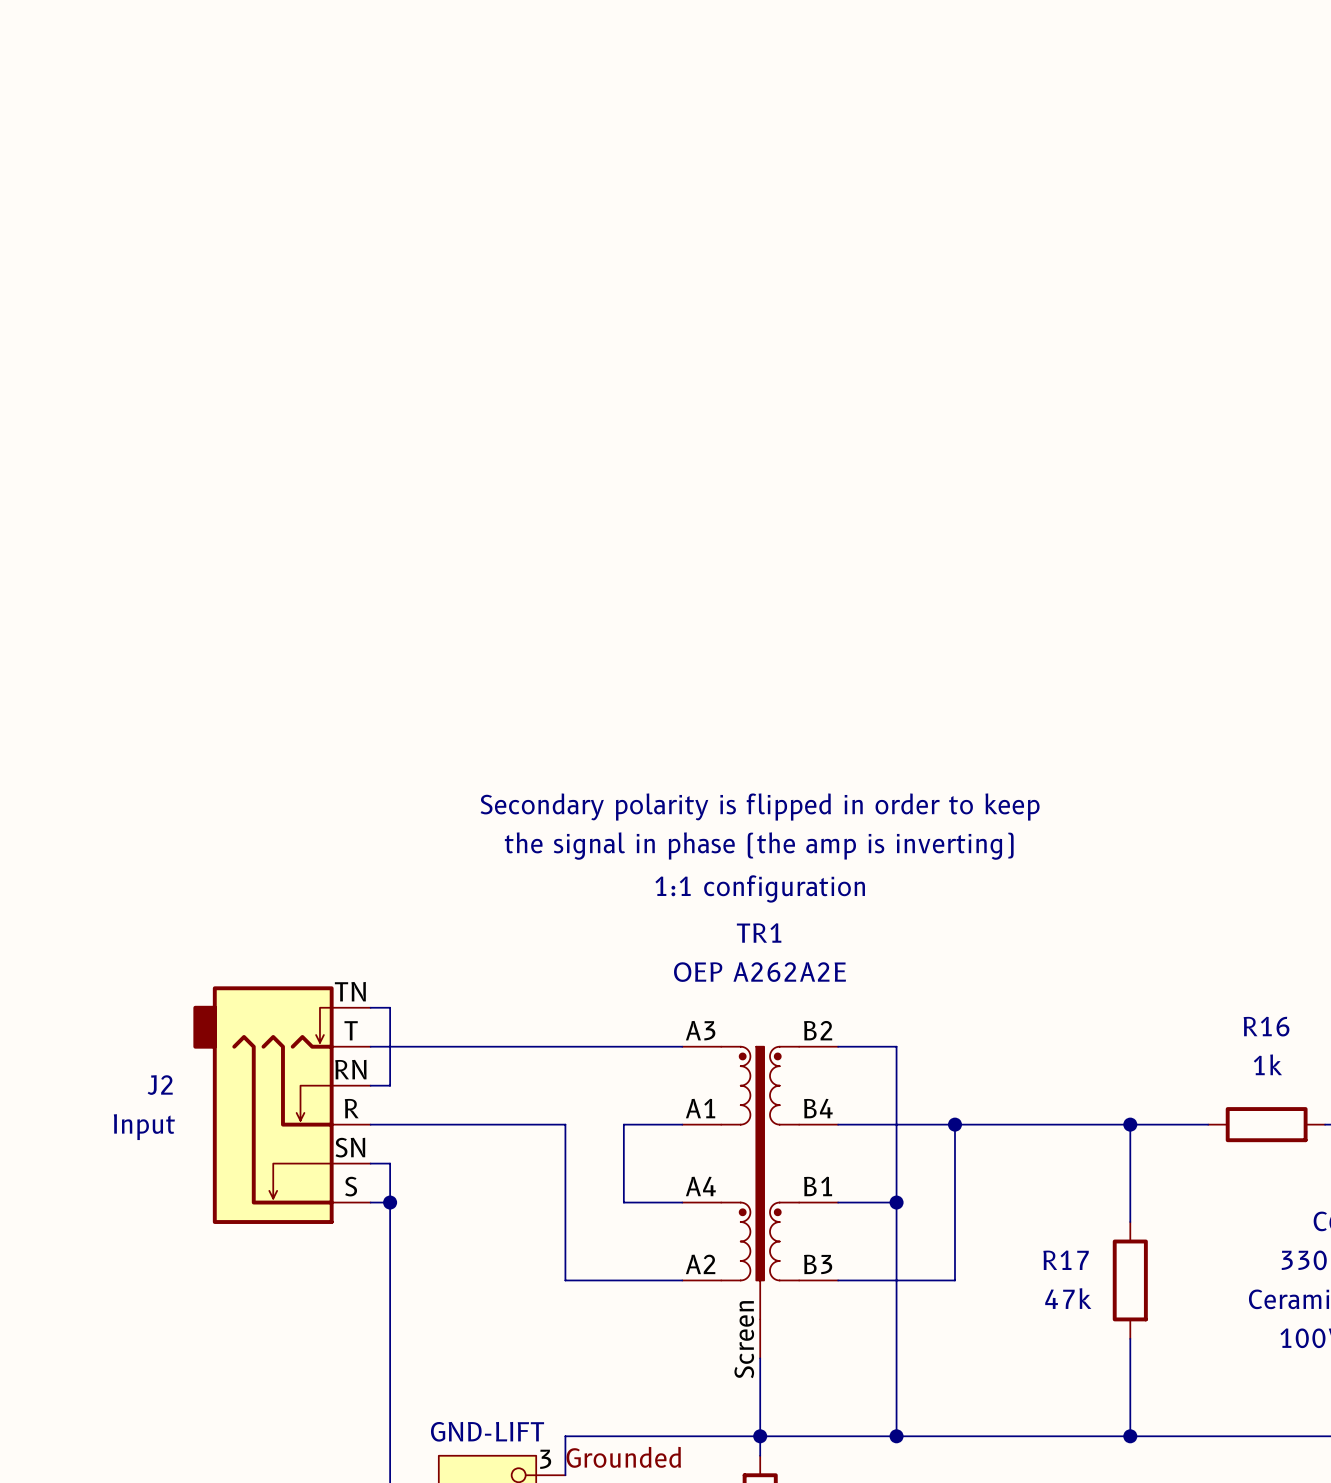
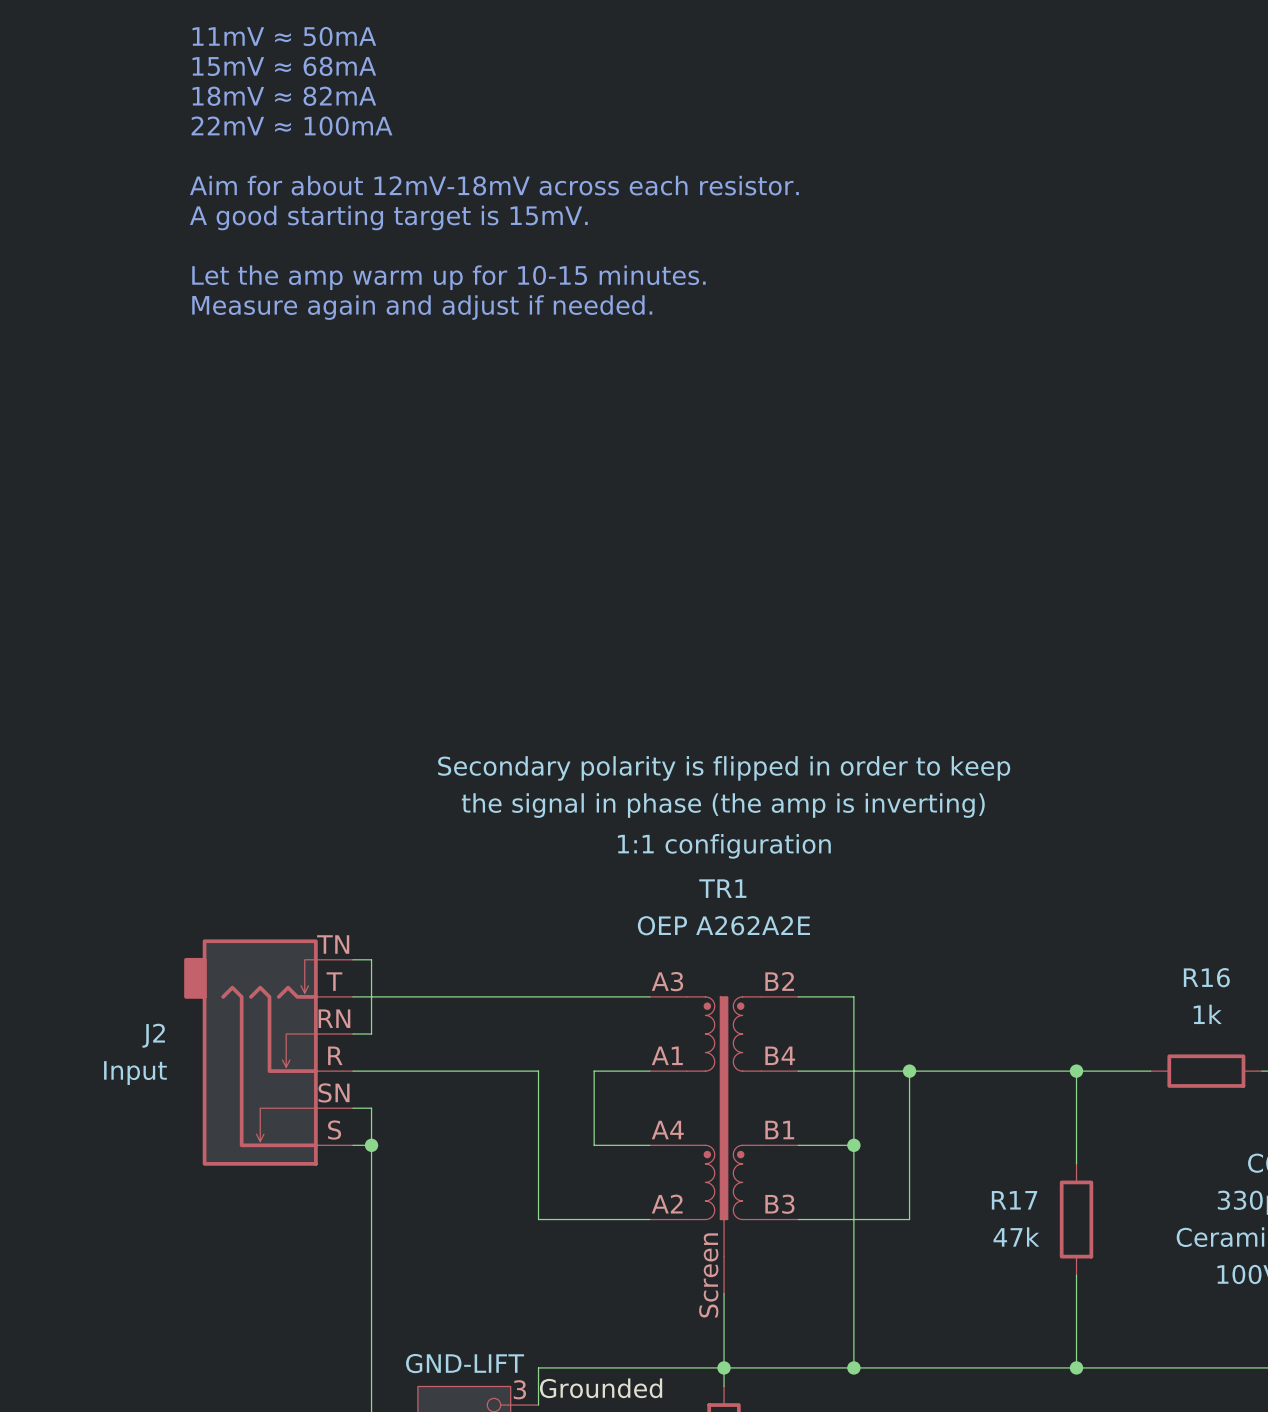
text: none -> 11mV ≈ 50mA (284, 36)
text: none -> 15mV ≈ 68mA (284, 66)
text: none -> 18mV ≈ 82mA (284, 96)
text: none -> 22mV ≈ 100mA (291, 126)
text: none -> Aim for about 12mV-18mV across each resistor. (494, 185)
text: none -> A good starting target is 15mV. (388, 217)
text: none -> Let the amp warm up for 10-15 minutes. (448, 277)
text: none -> Measure again and adjust if needed. (422, 307)

